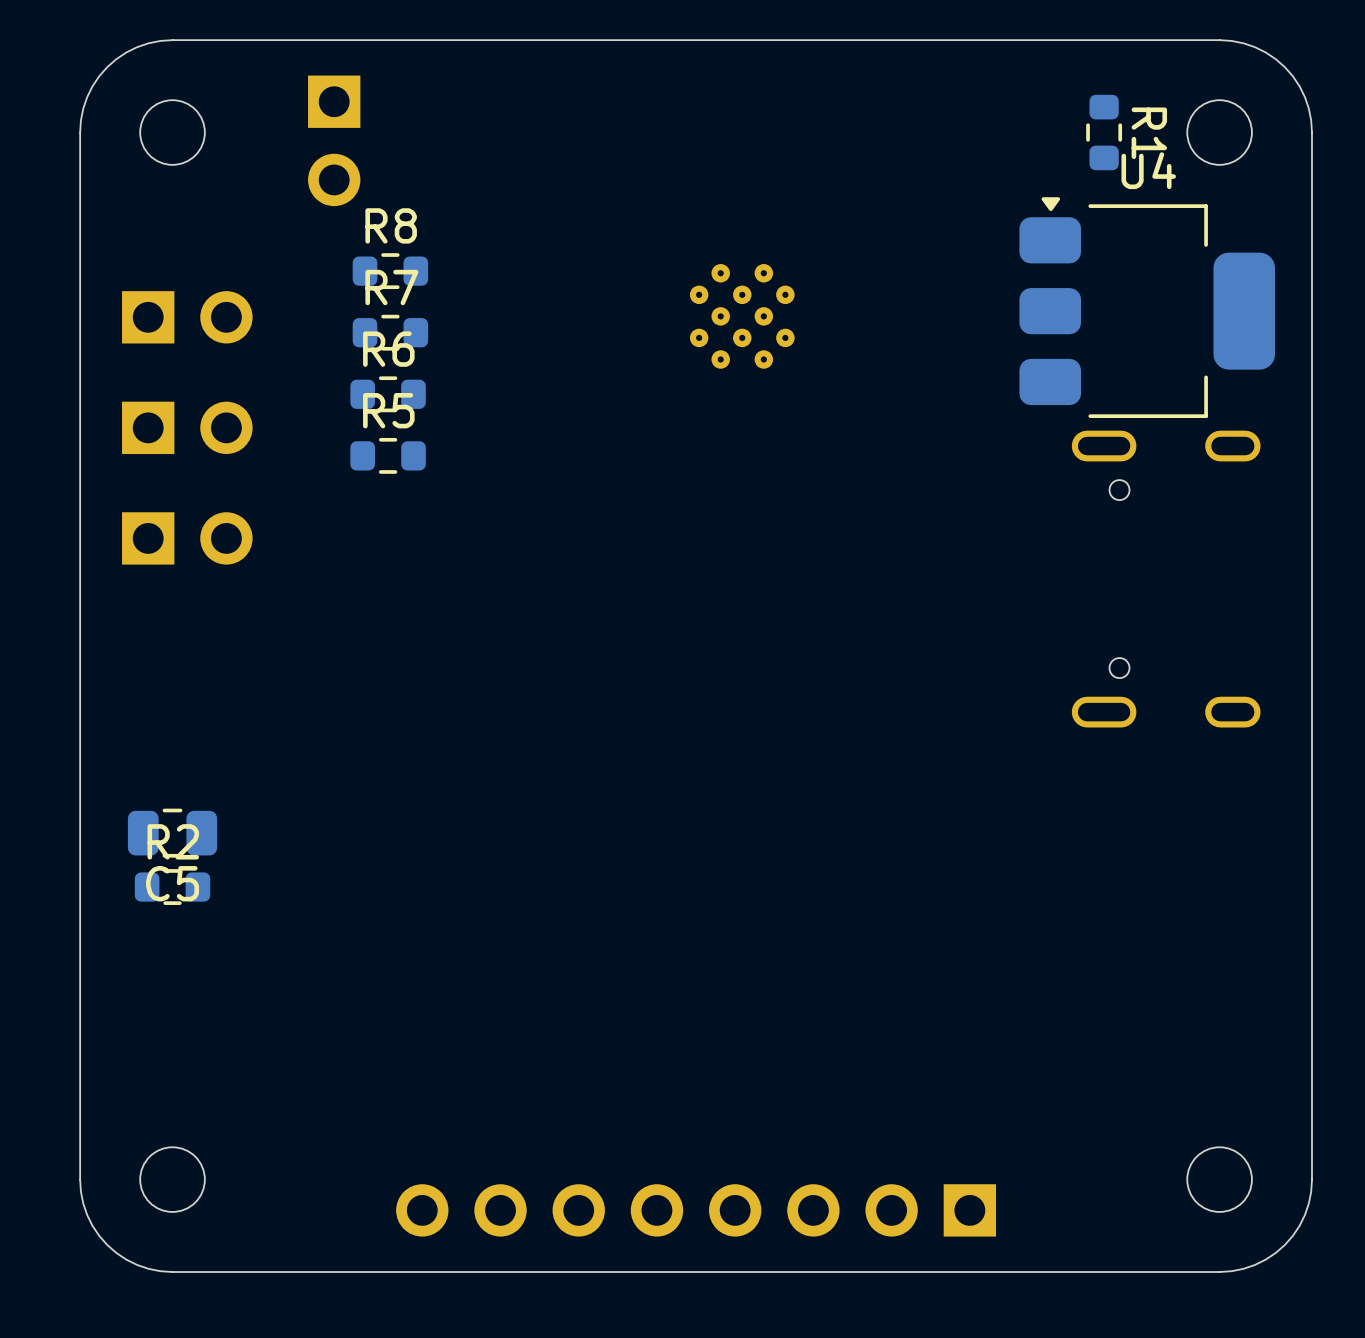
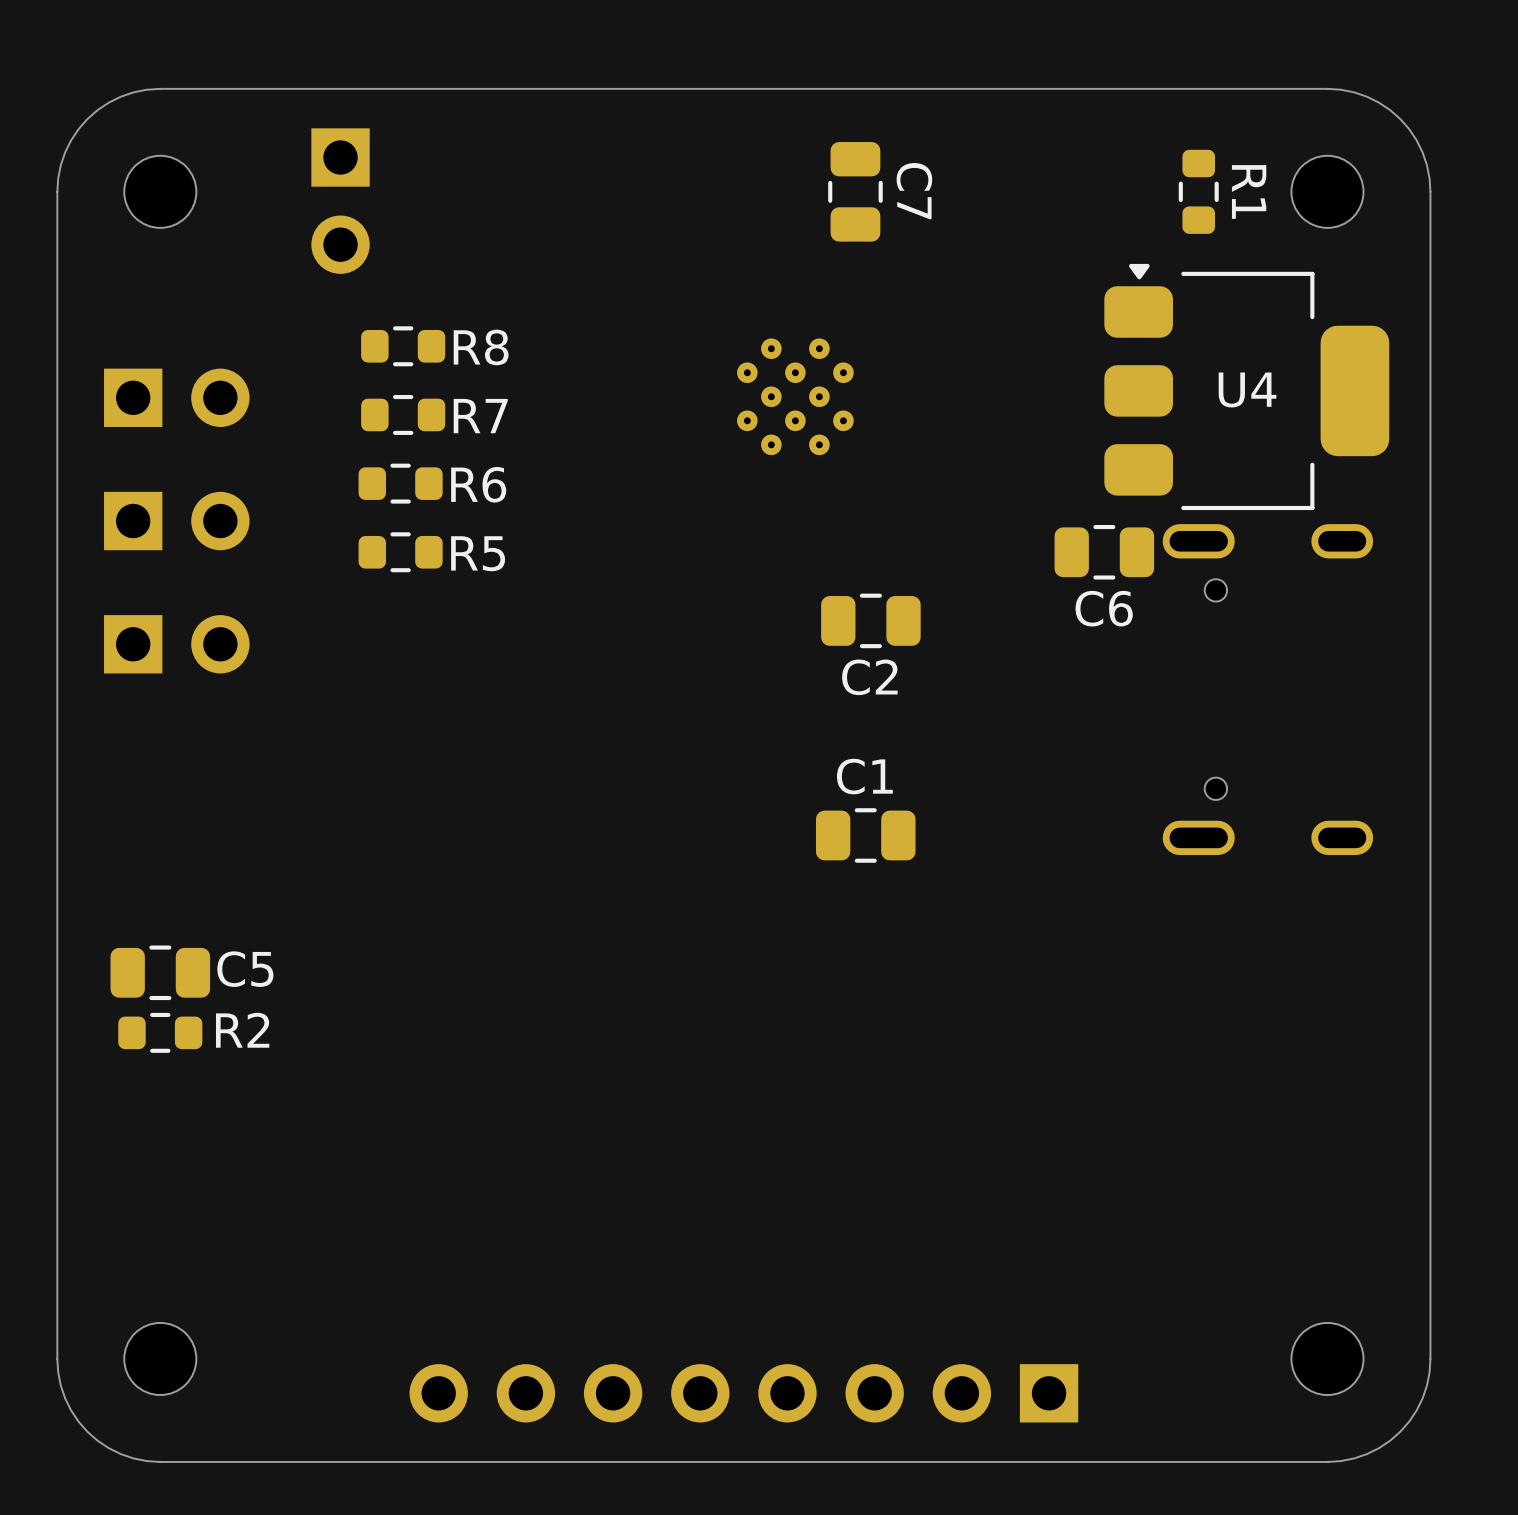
C7: none -> (855, 191)
U4 name position: U4 (1148, 170) -> U4 (1247, 389)
R8 name position: R8 (391, 225) -> R8 (481, 347)
R7 name position: R7 (391, 287) -> R7 (480, 416)
R6 name position: R6 (388, 349) -> R6 (478, 484)
R5 name position: R5 (388, 410) -> R5 (478, 553)
C6: none -> (1104, 552)
C2: none -> (870, 620)
C1: none -> (865, 835)
R2 name position: R2 (173, 841) -> R2 (242, 1030)
C5 name position: C5 (172, 883) -> C5 (245, 969)

